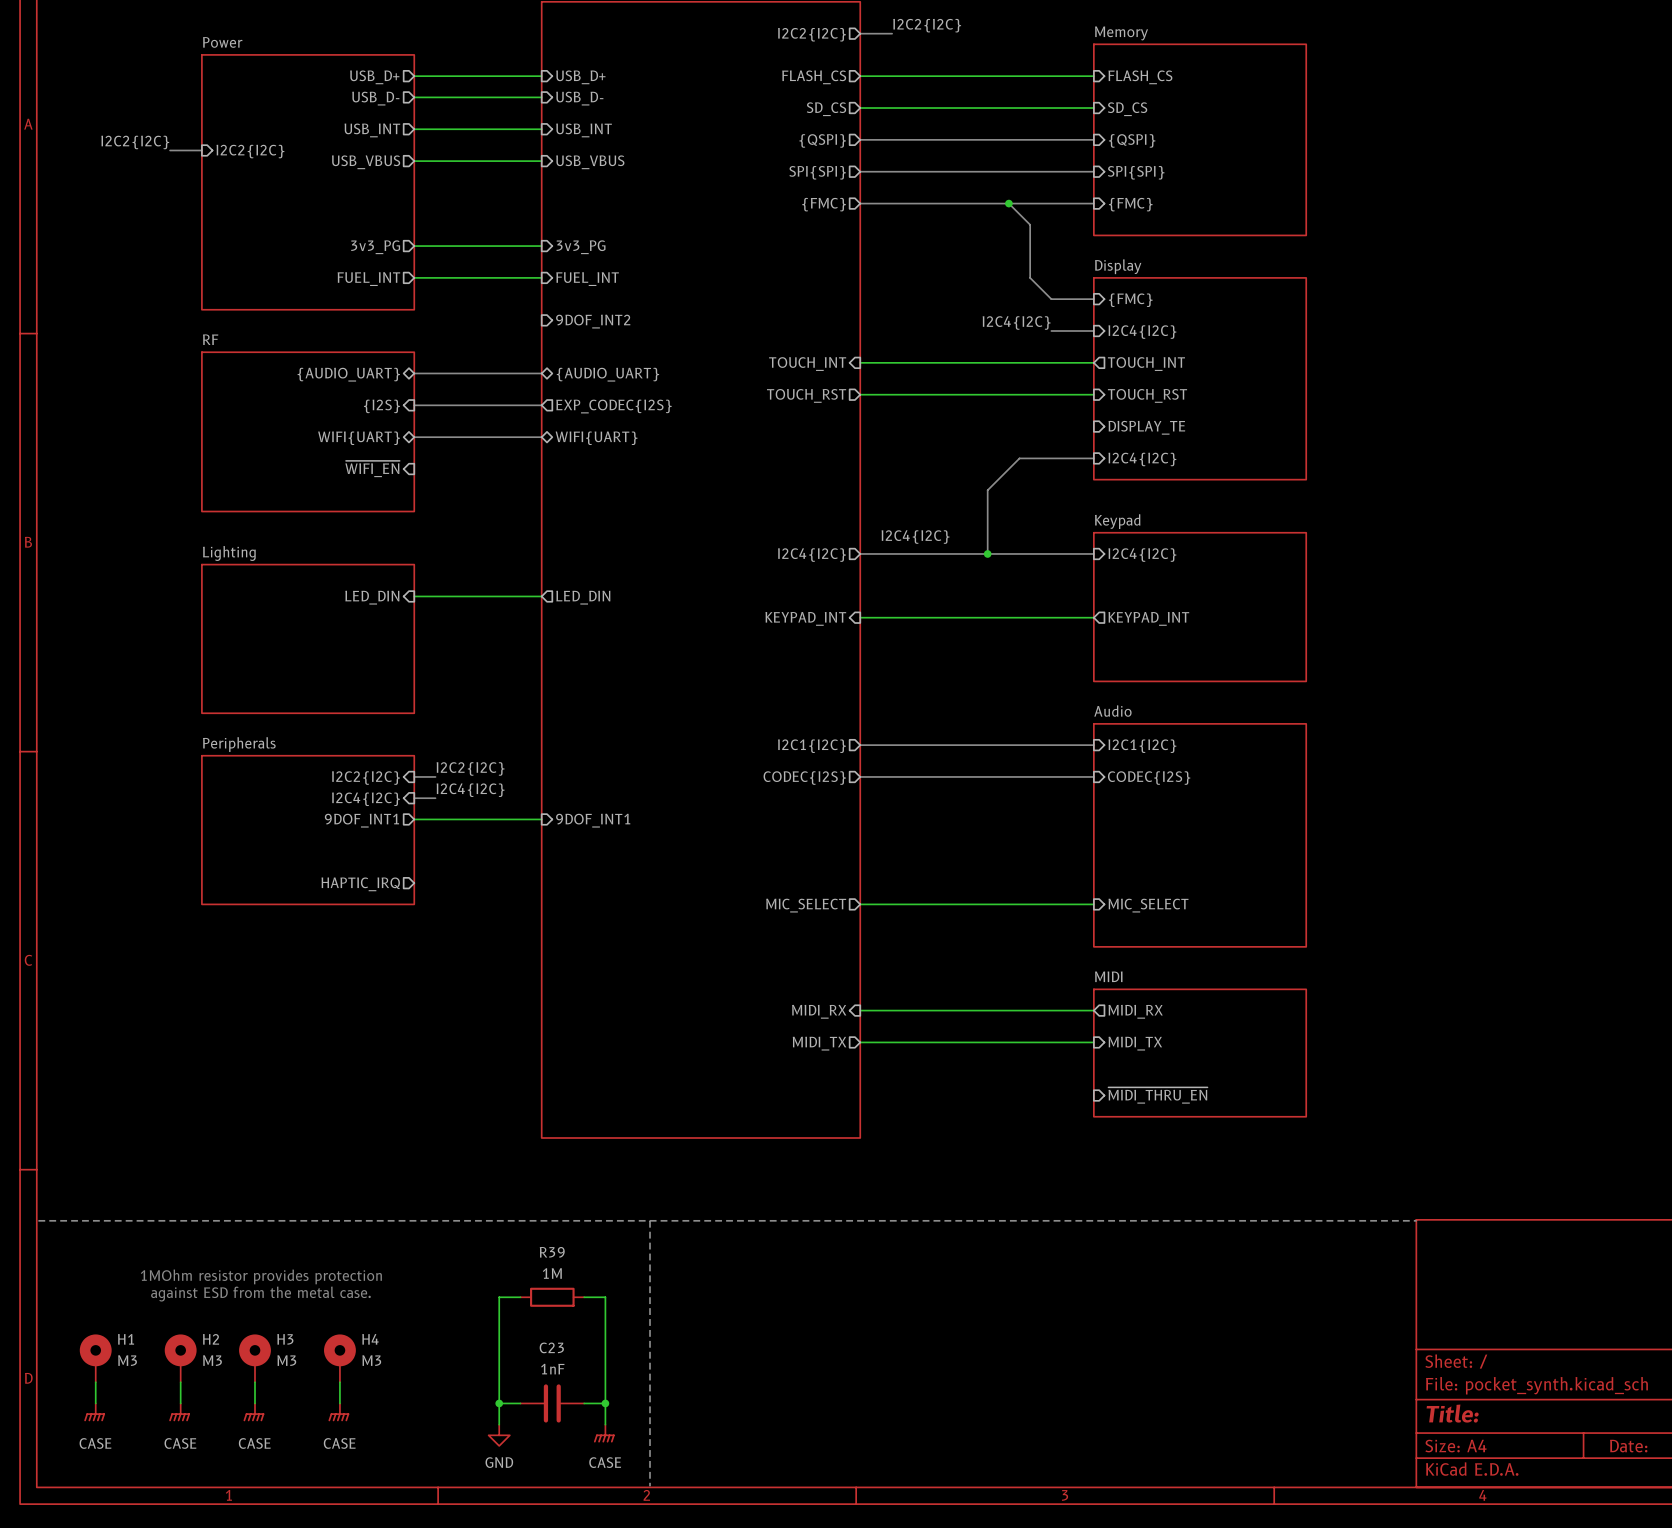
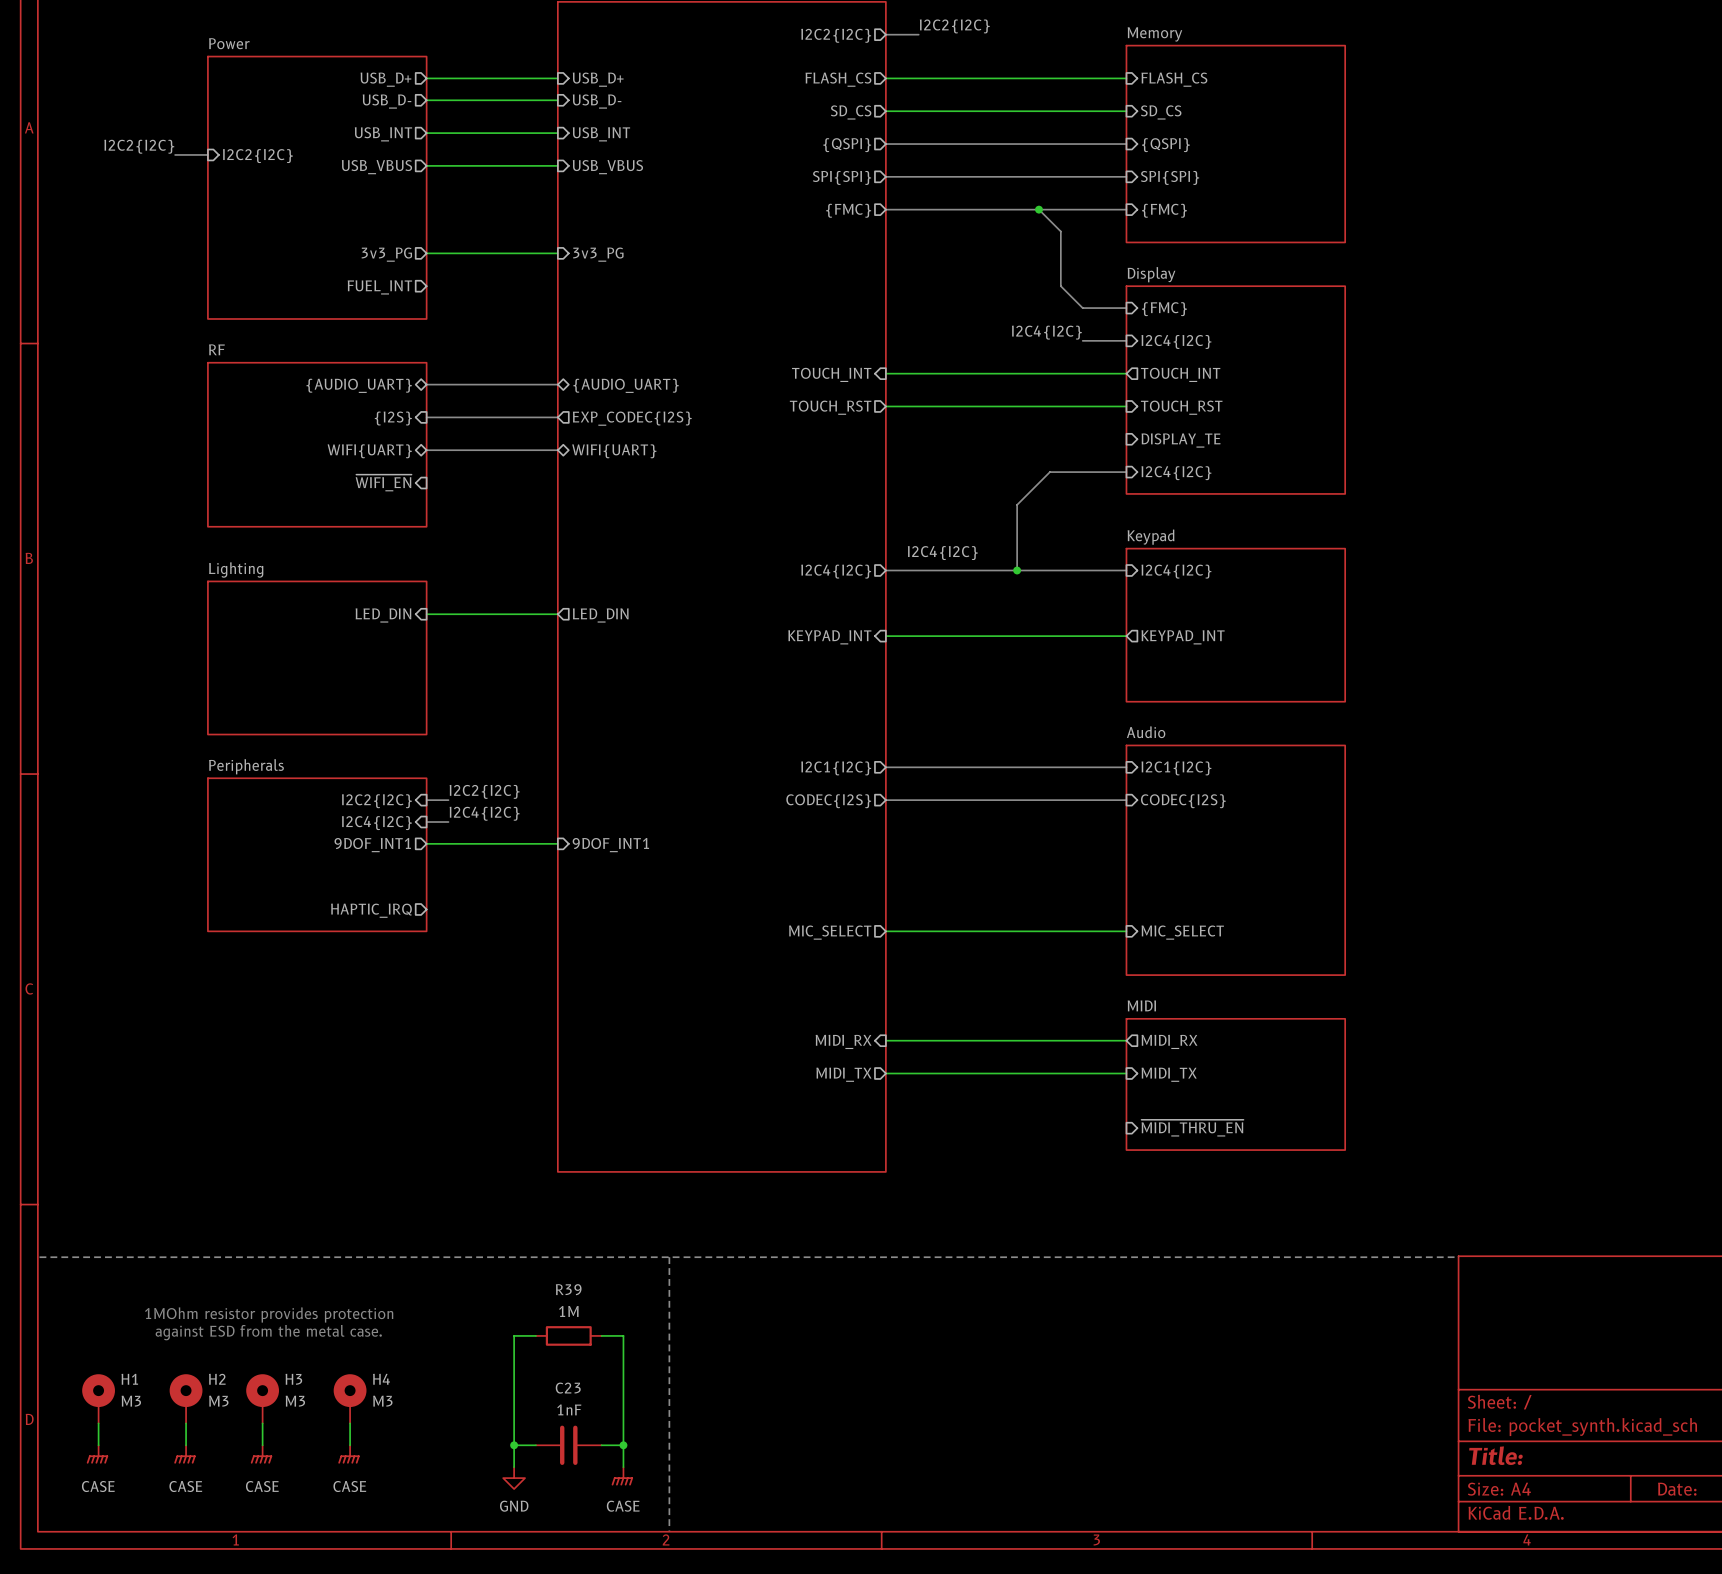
wire: (414, 277) (541, 277) -> none
sheet pin: FUEL_INT (587, 279) -> none
sheet pin: 9DOF_INT2 (593, 321) -> none

